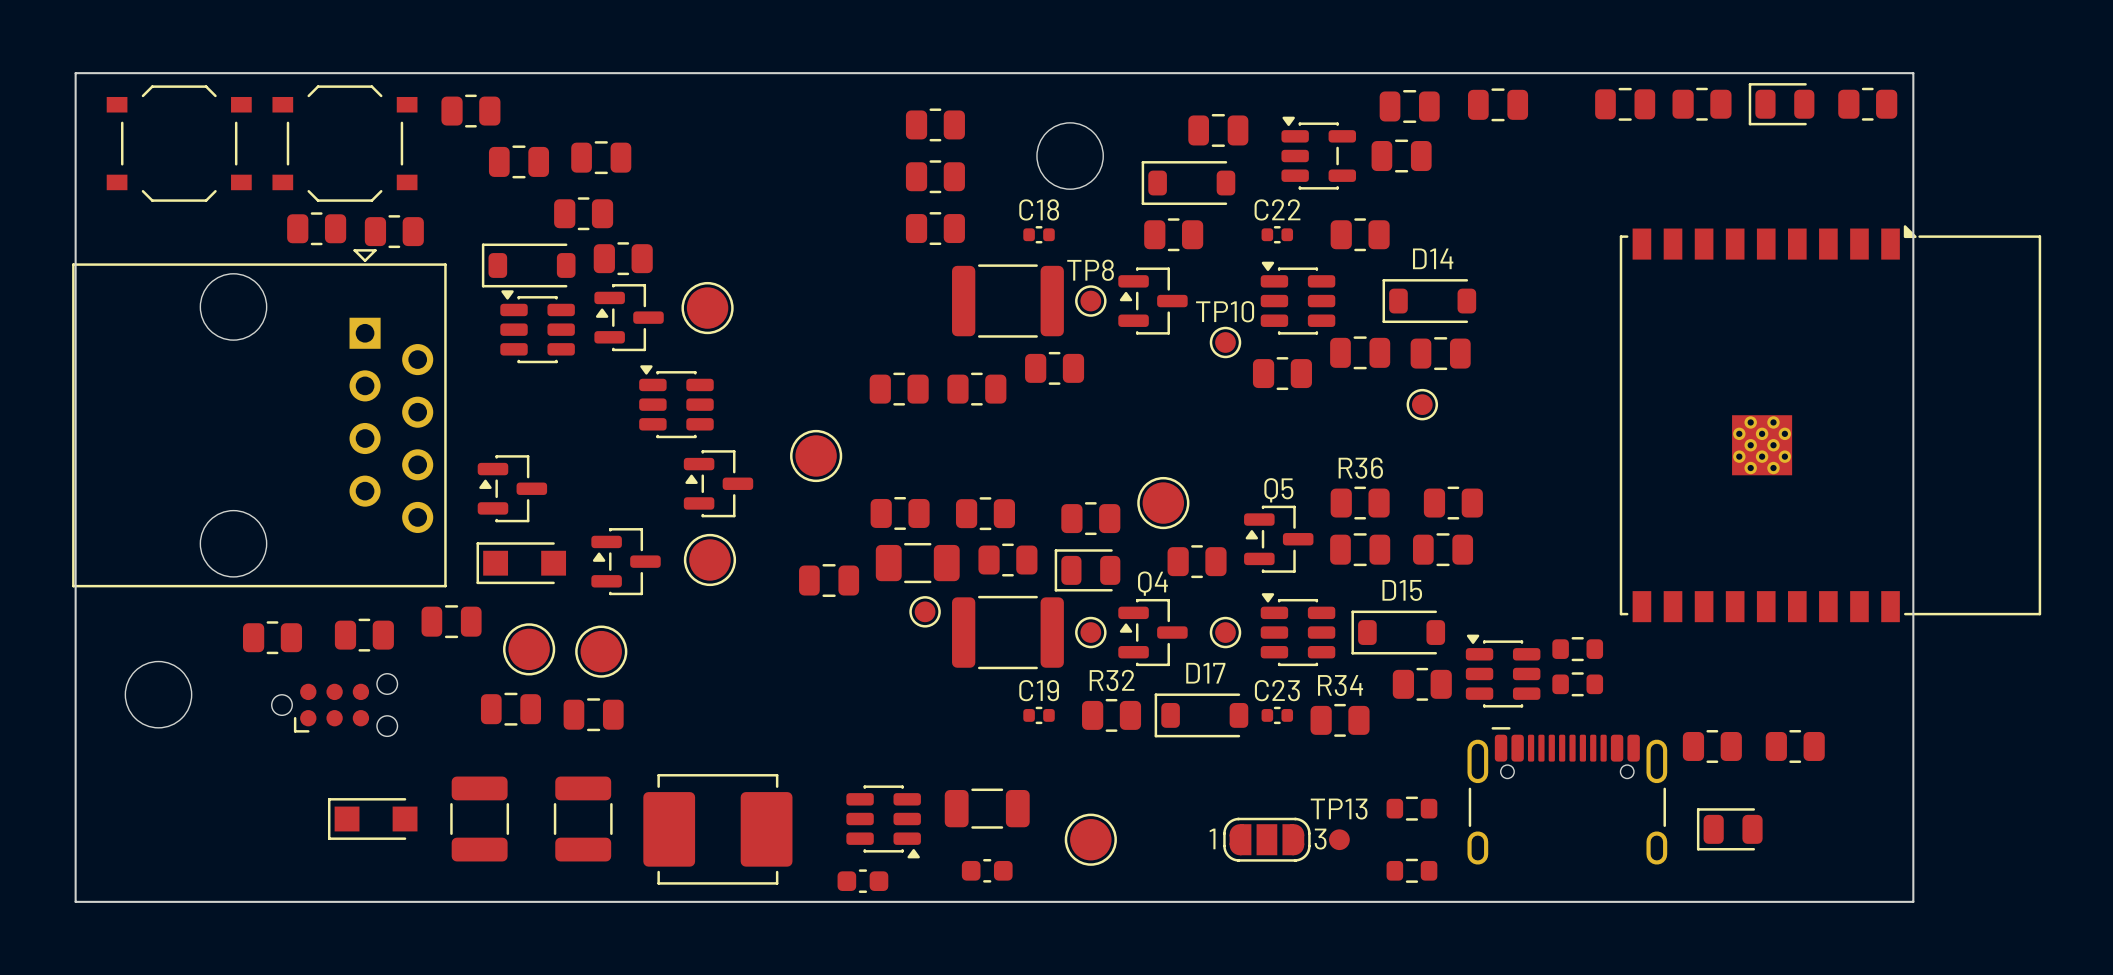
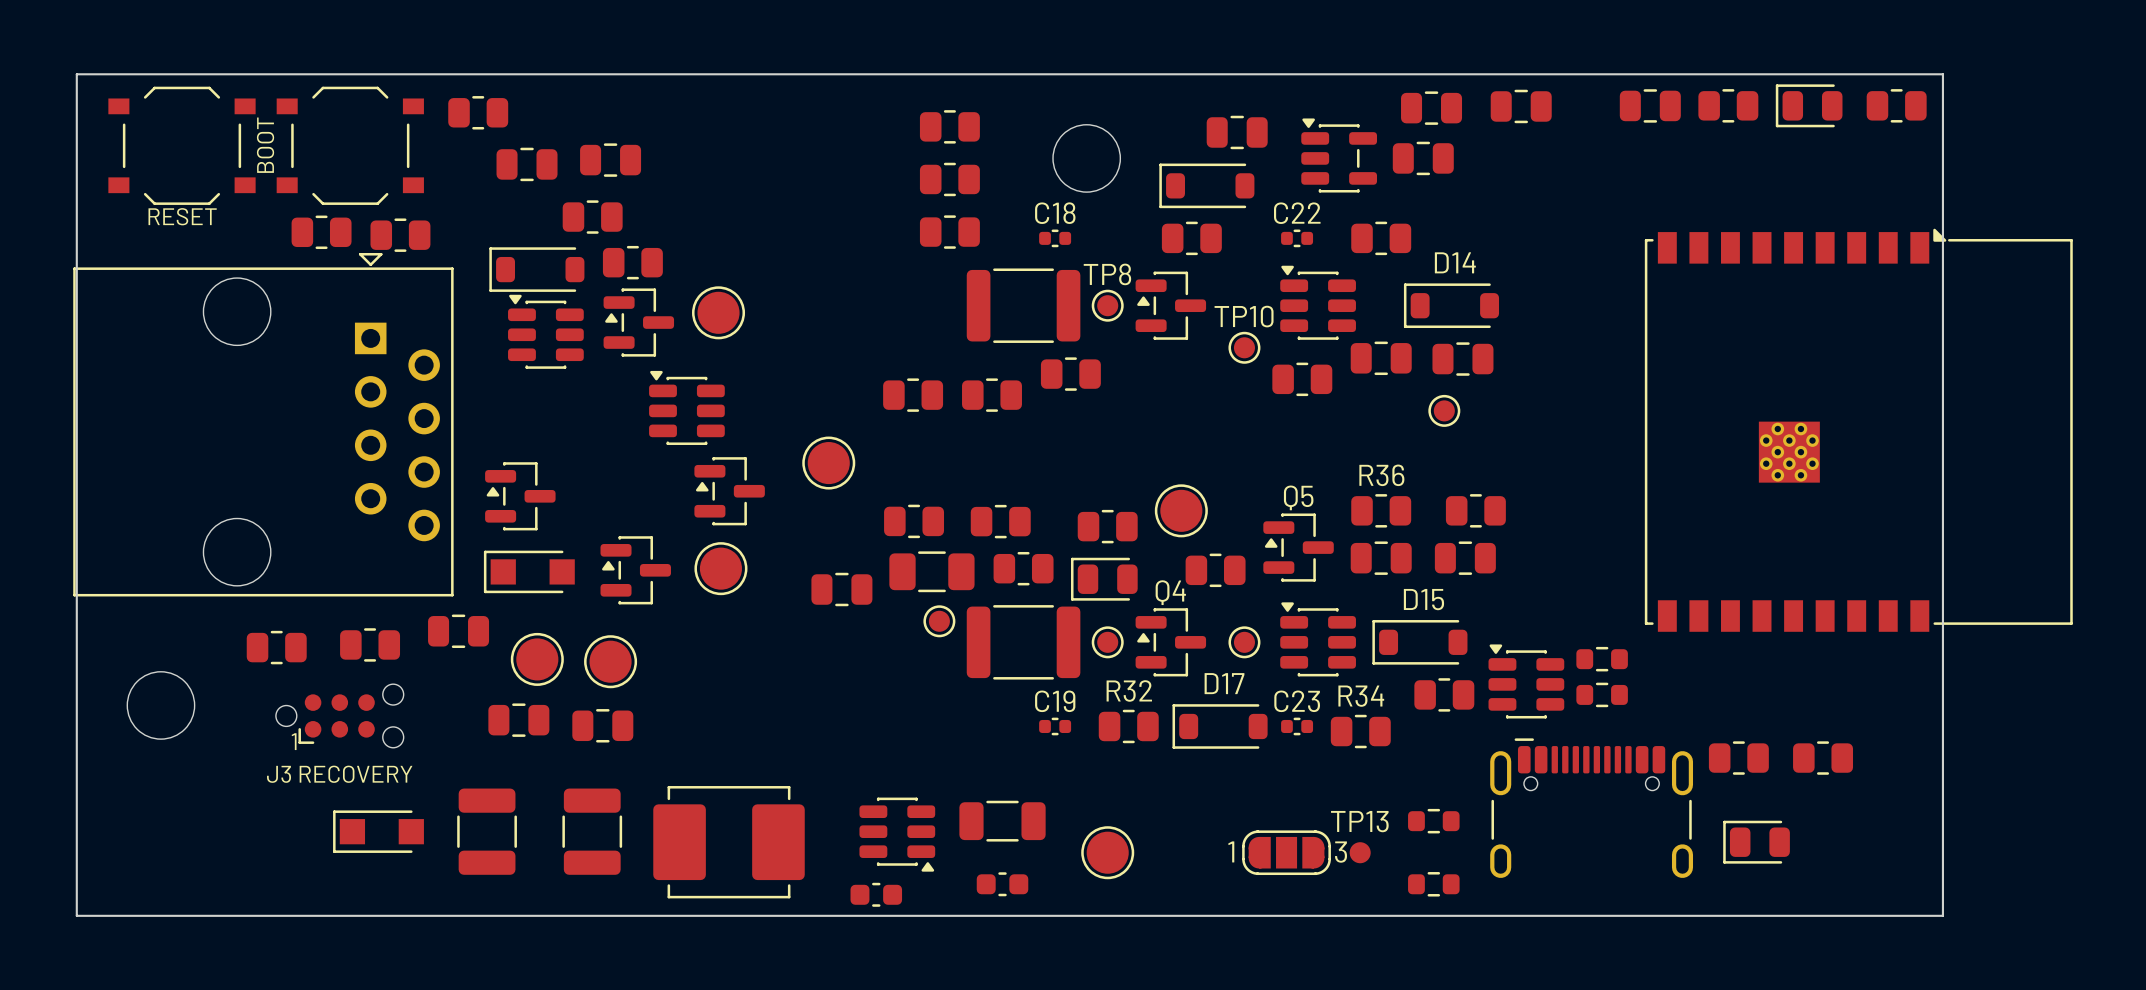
part text: none -> BOOT (265, 145)
part text: none -> RESET (182, 216)
part text: none -> 1 (294, 741)
part text: none -> J3 RECOVERY (339, 774)

